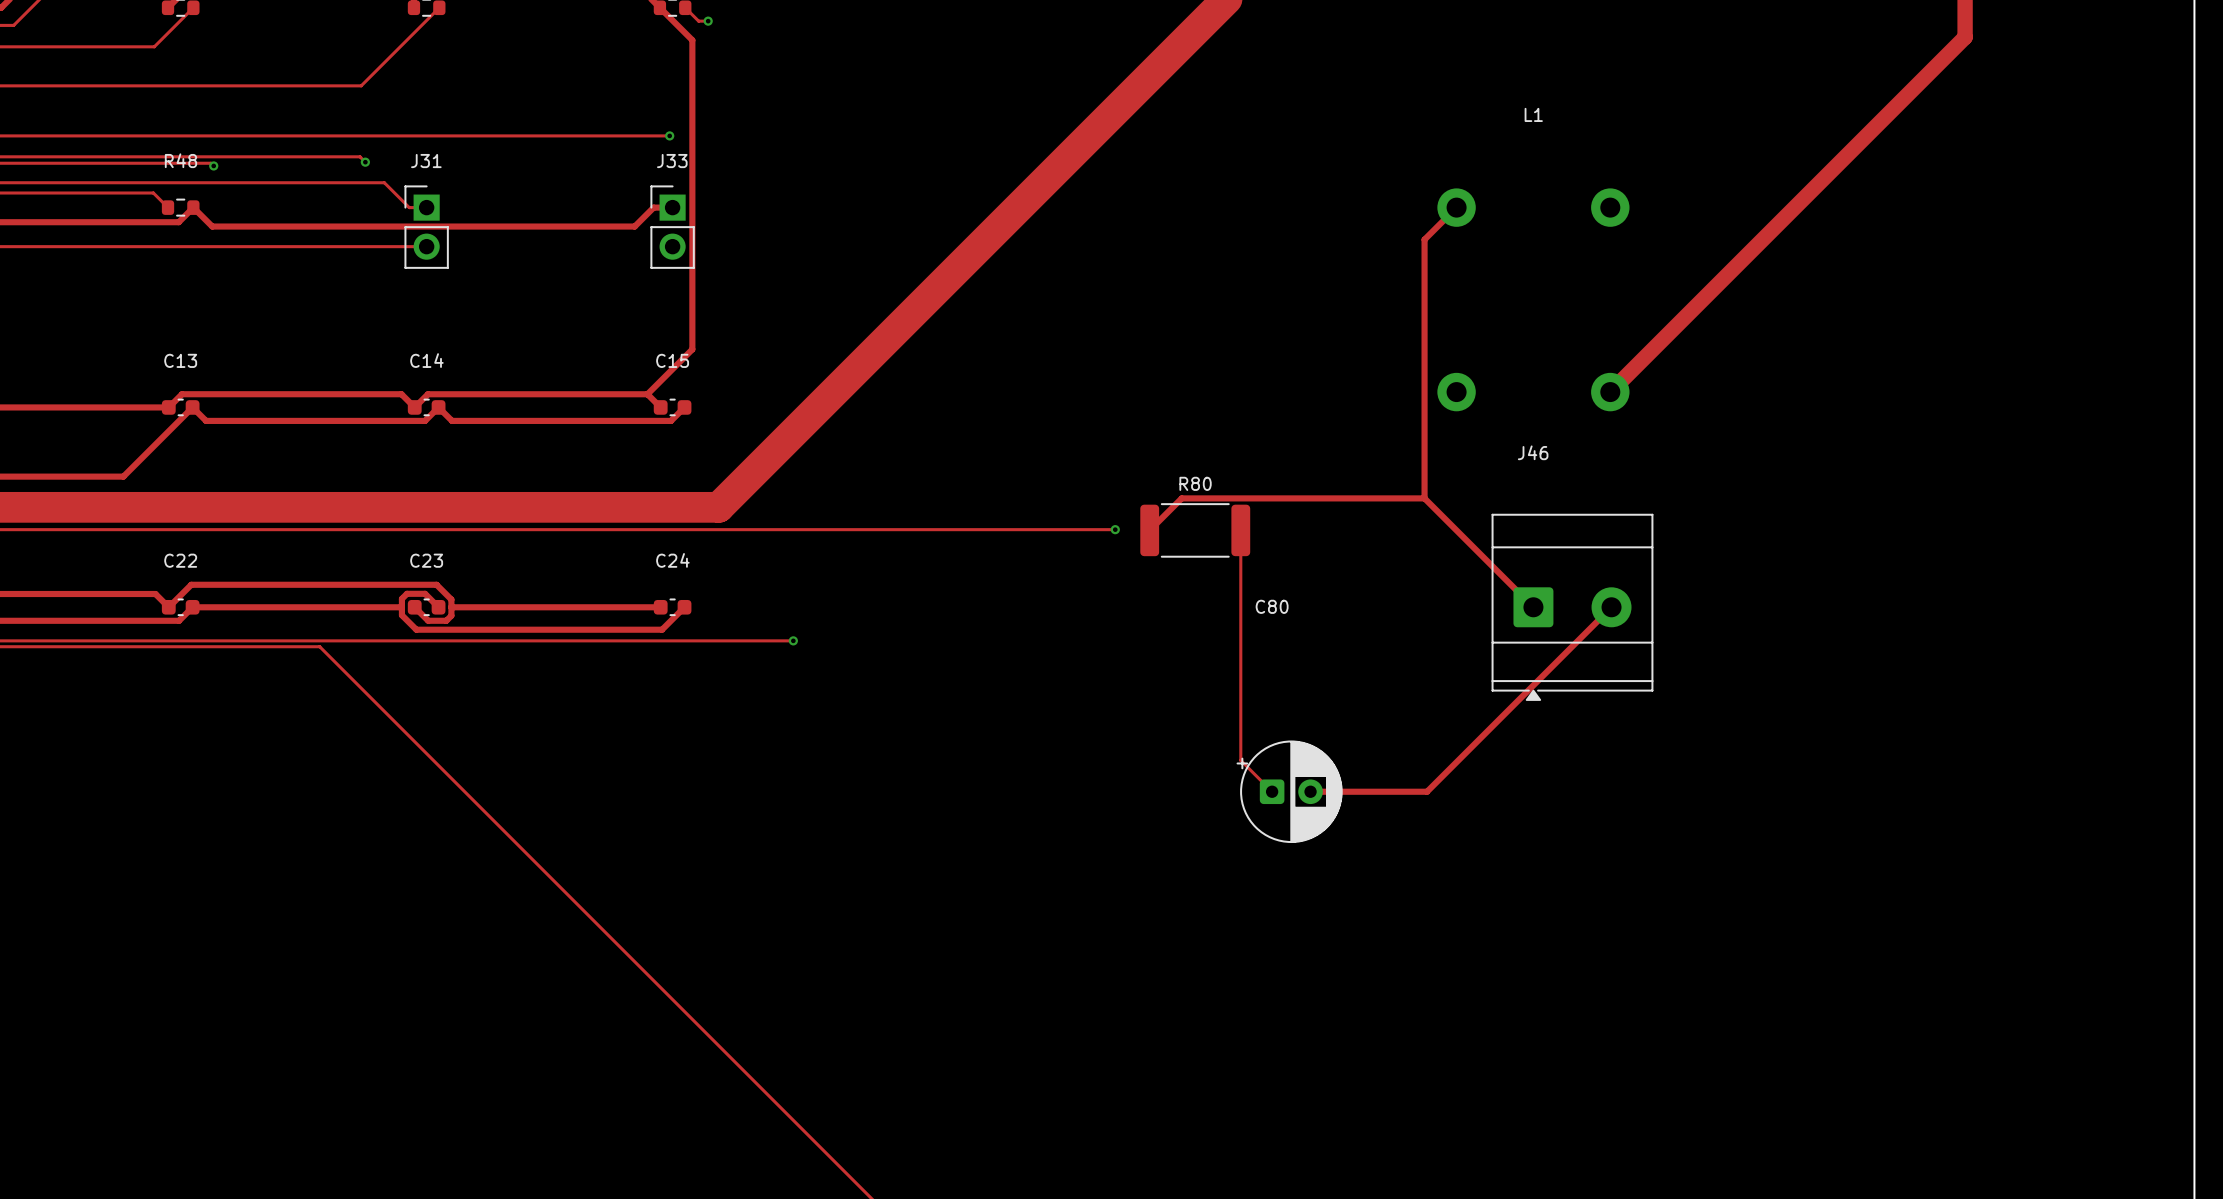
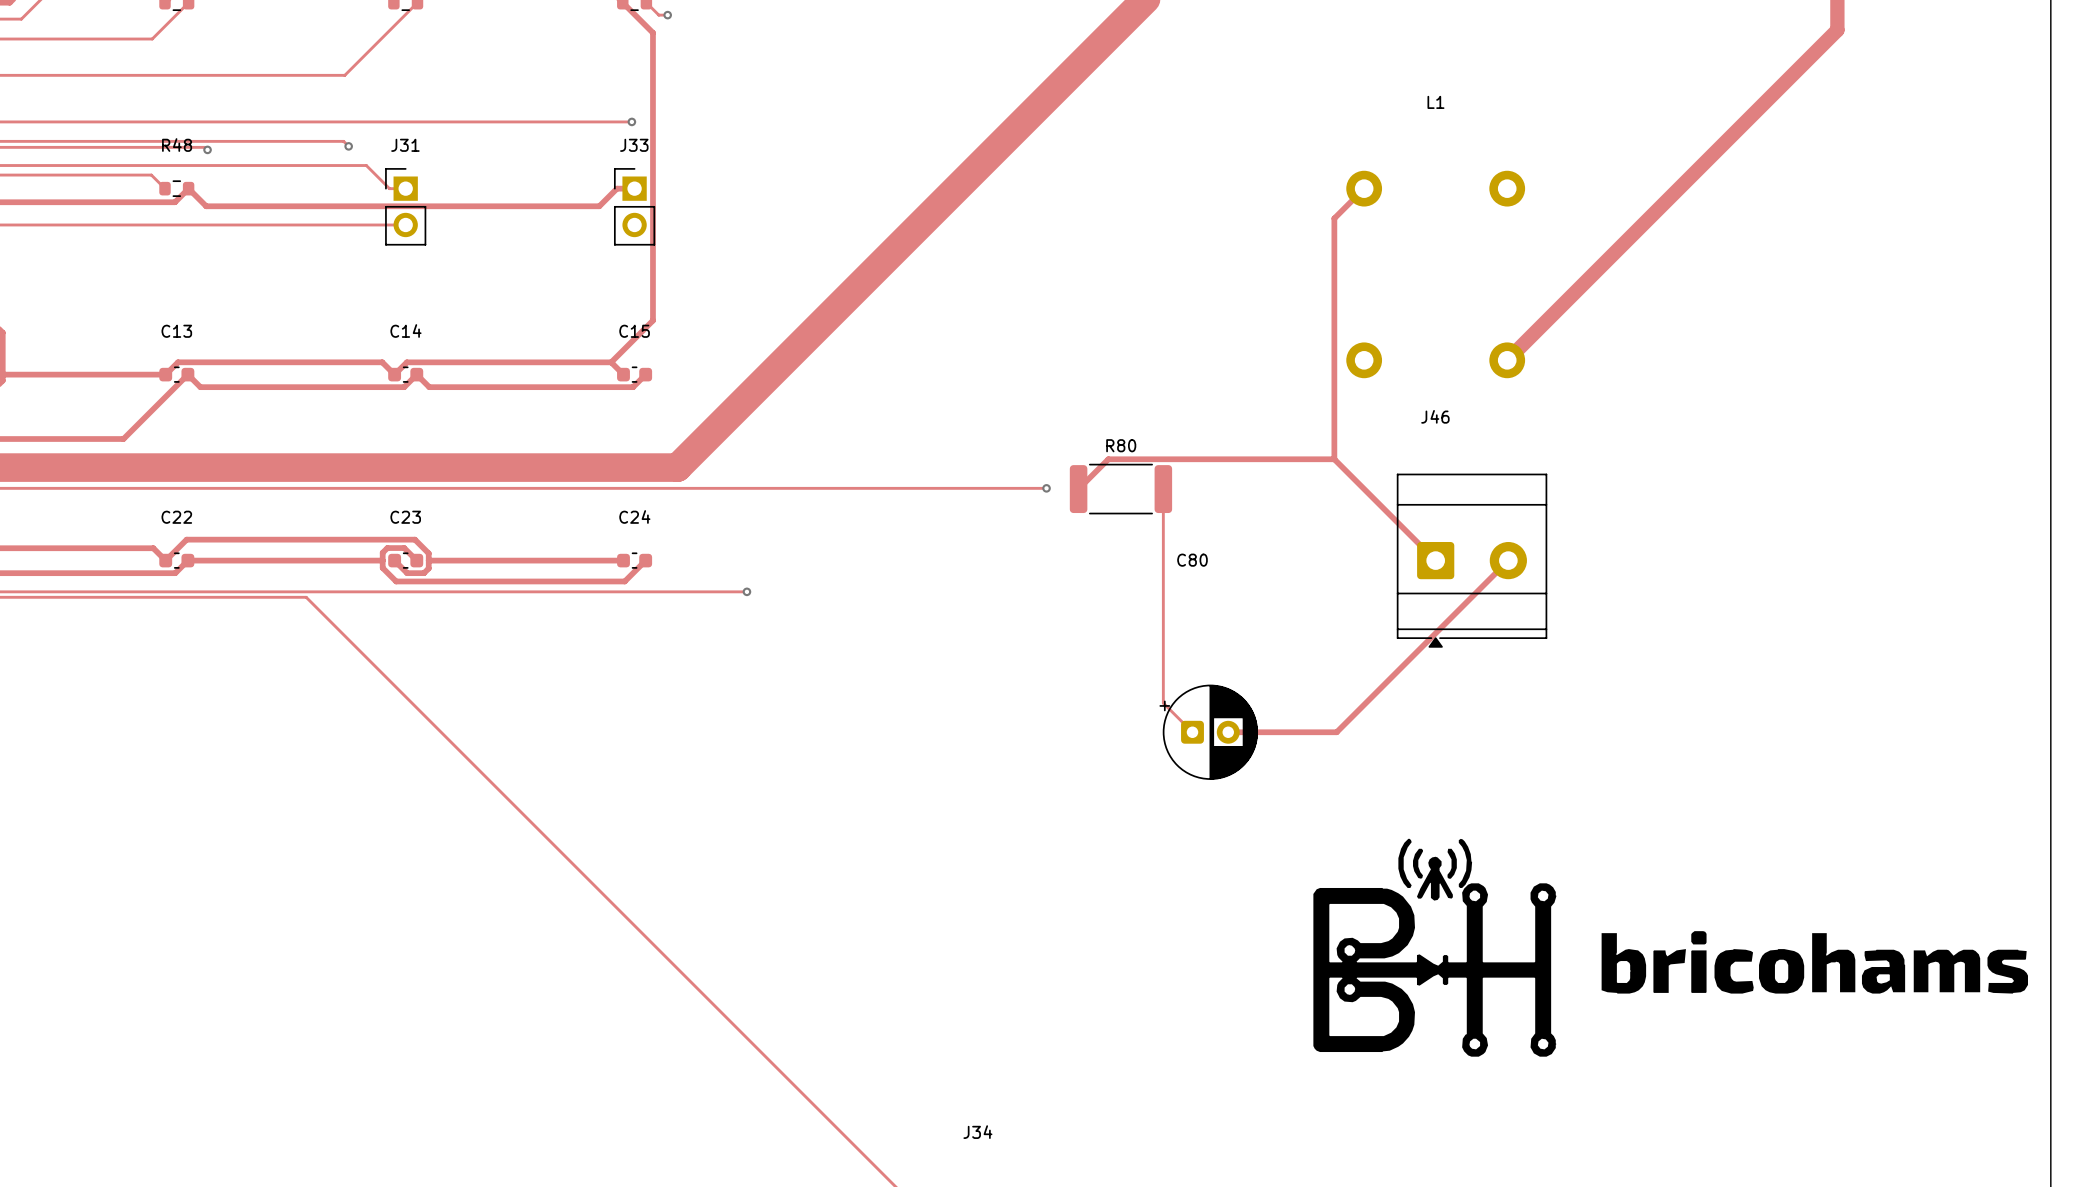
drawing: none -> [1313, 838, 1557, 1057]
drawing: none -> [1601, 931, 2028, 994]

